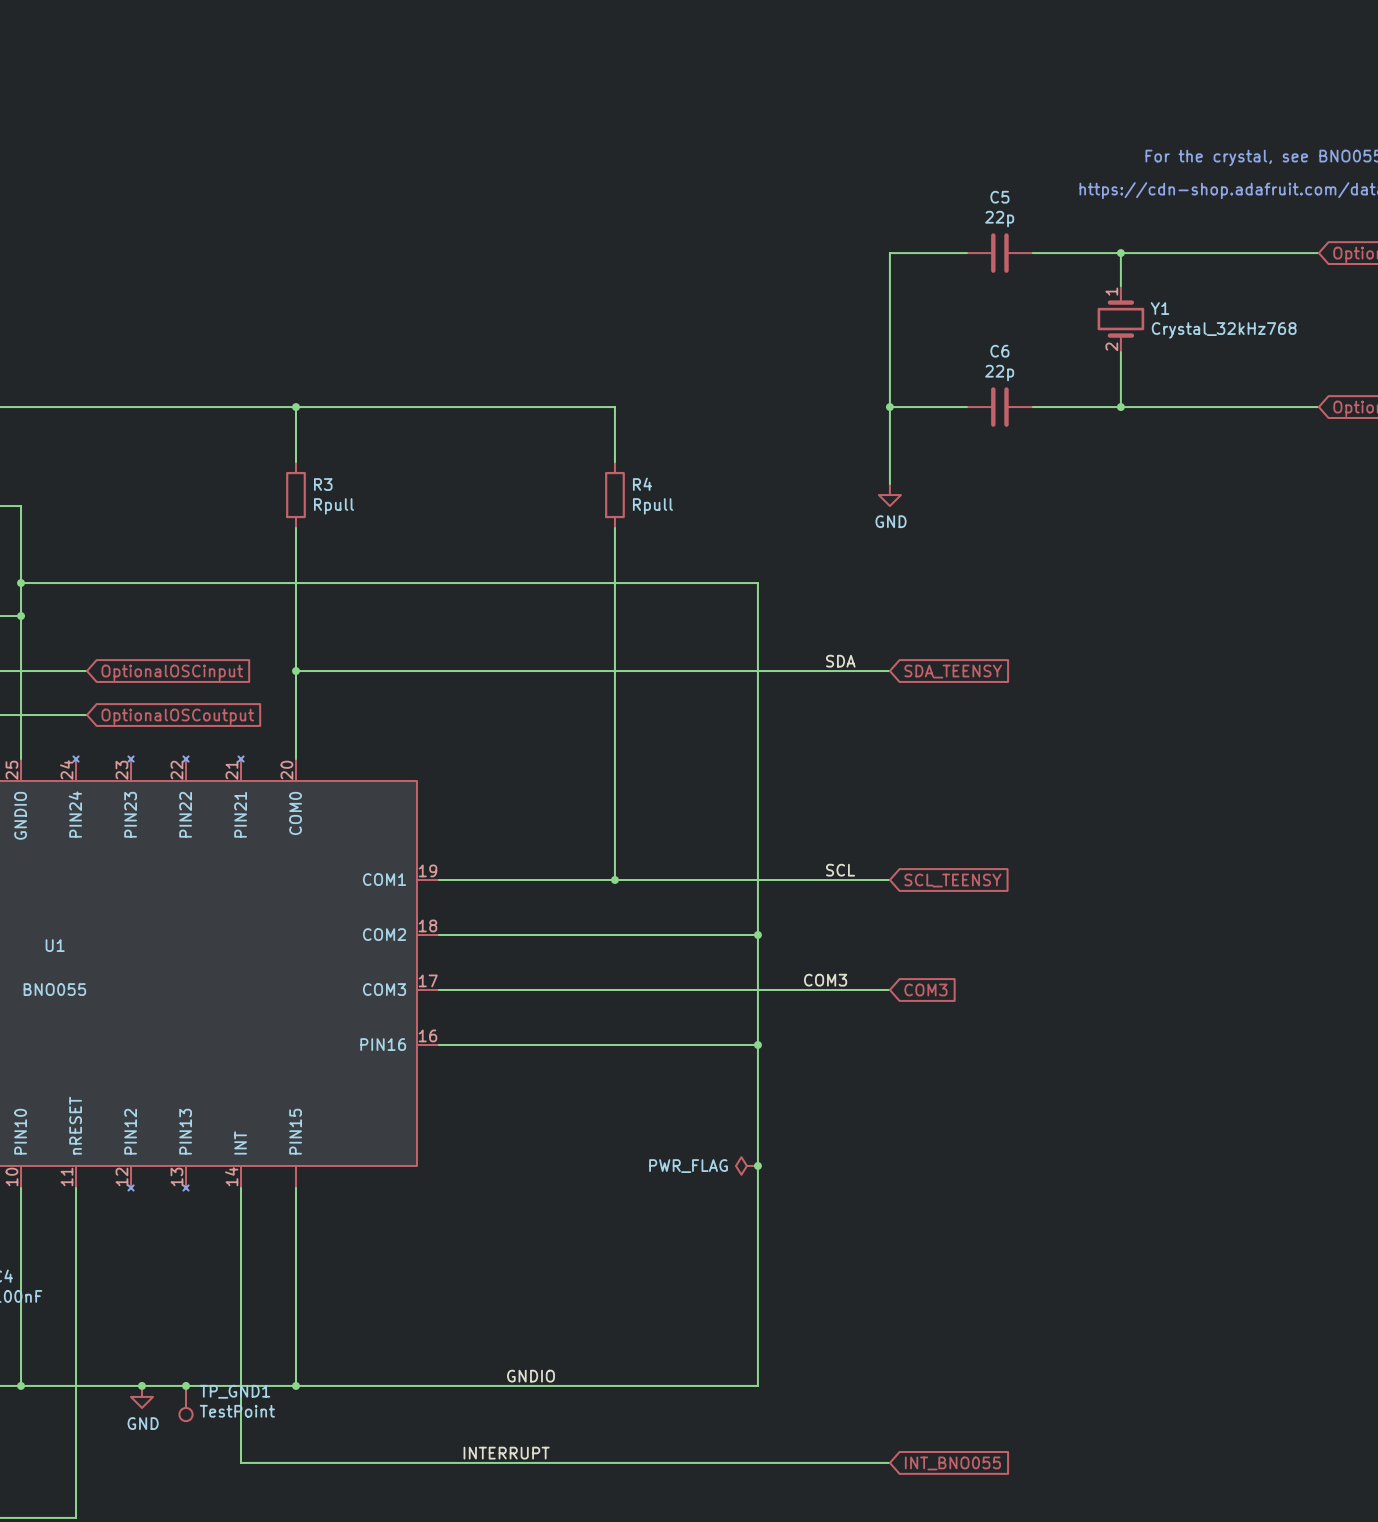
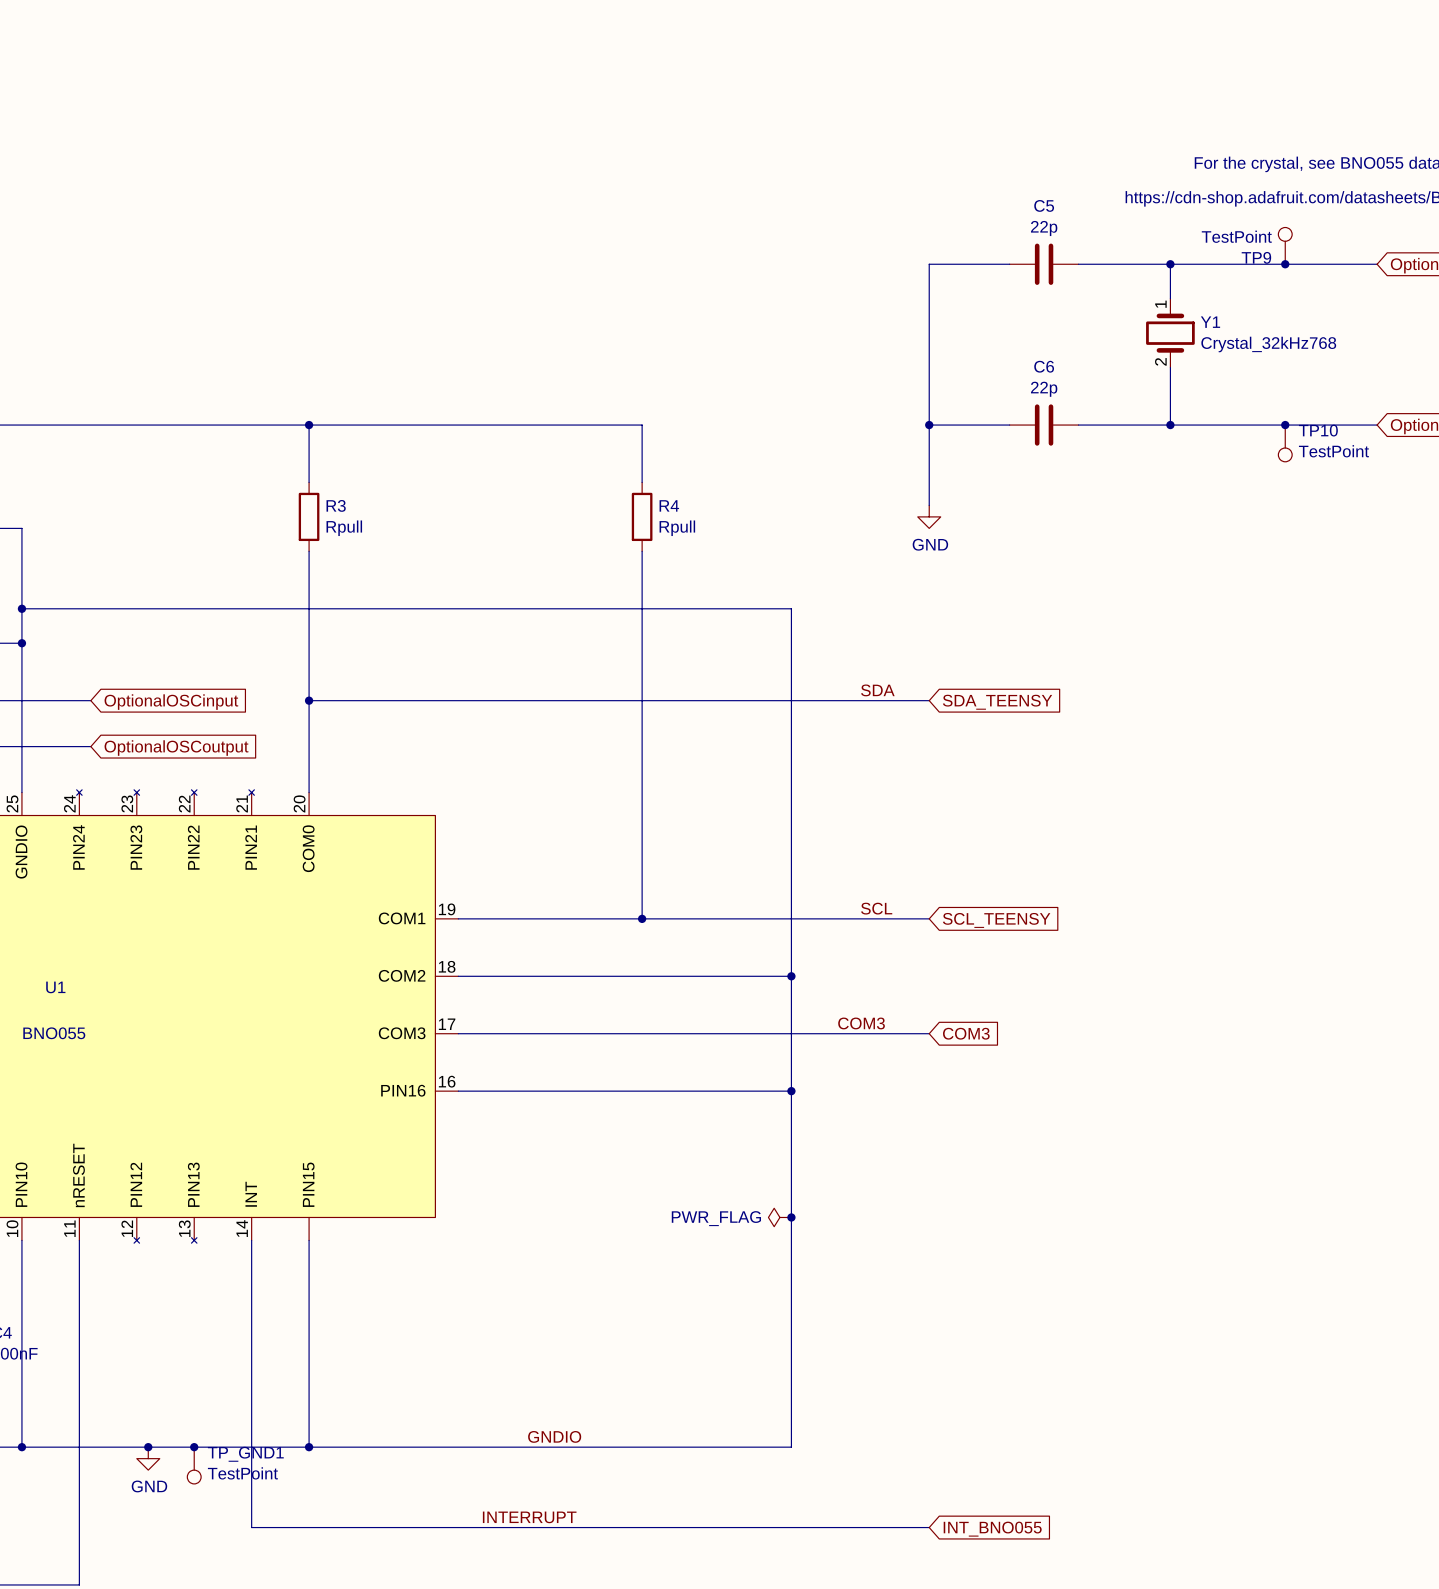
TP9: none -> TestPoint (1285, 245)
junction: none -> (1285, 264)
junction: none -> (1285, 425)
TP10: none -> TestPoint (1285, 443)

